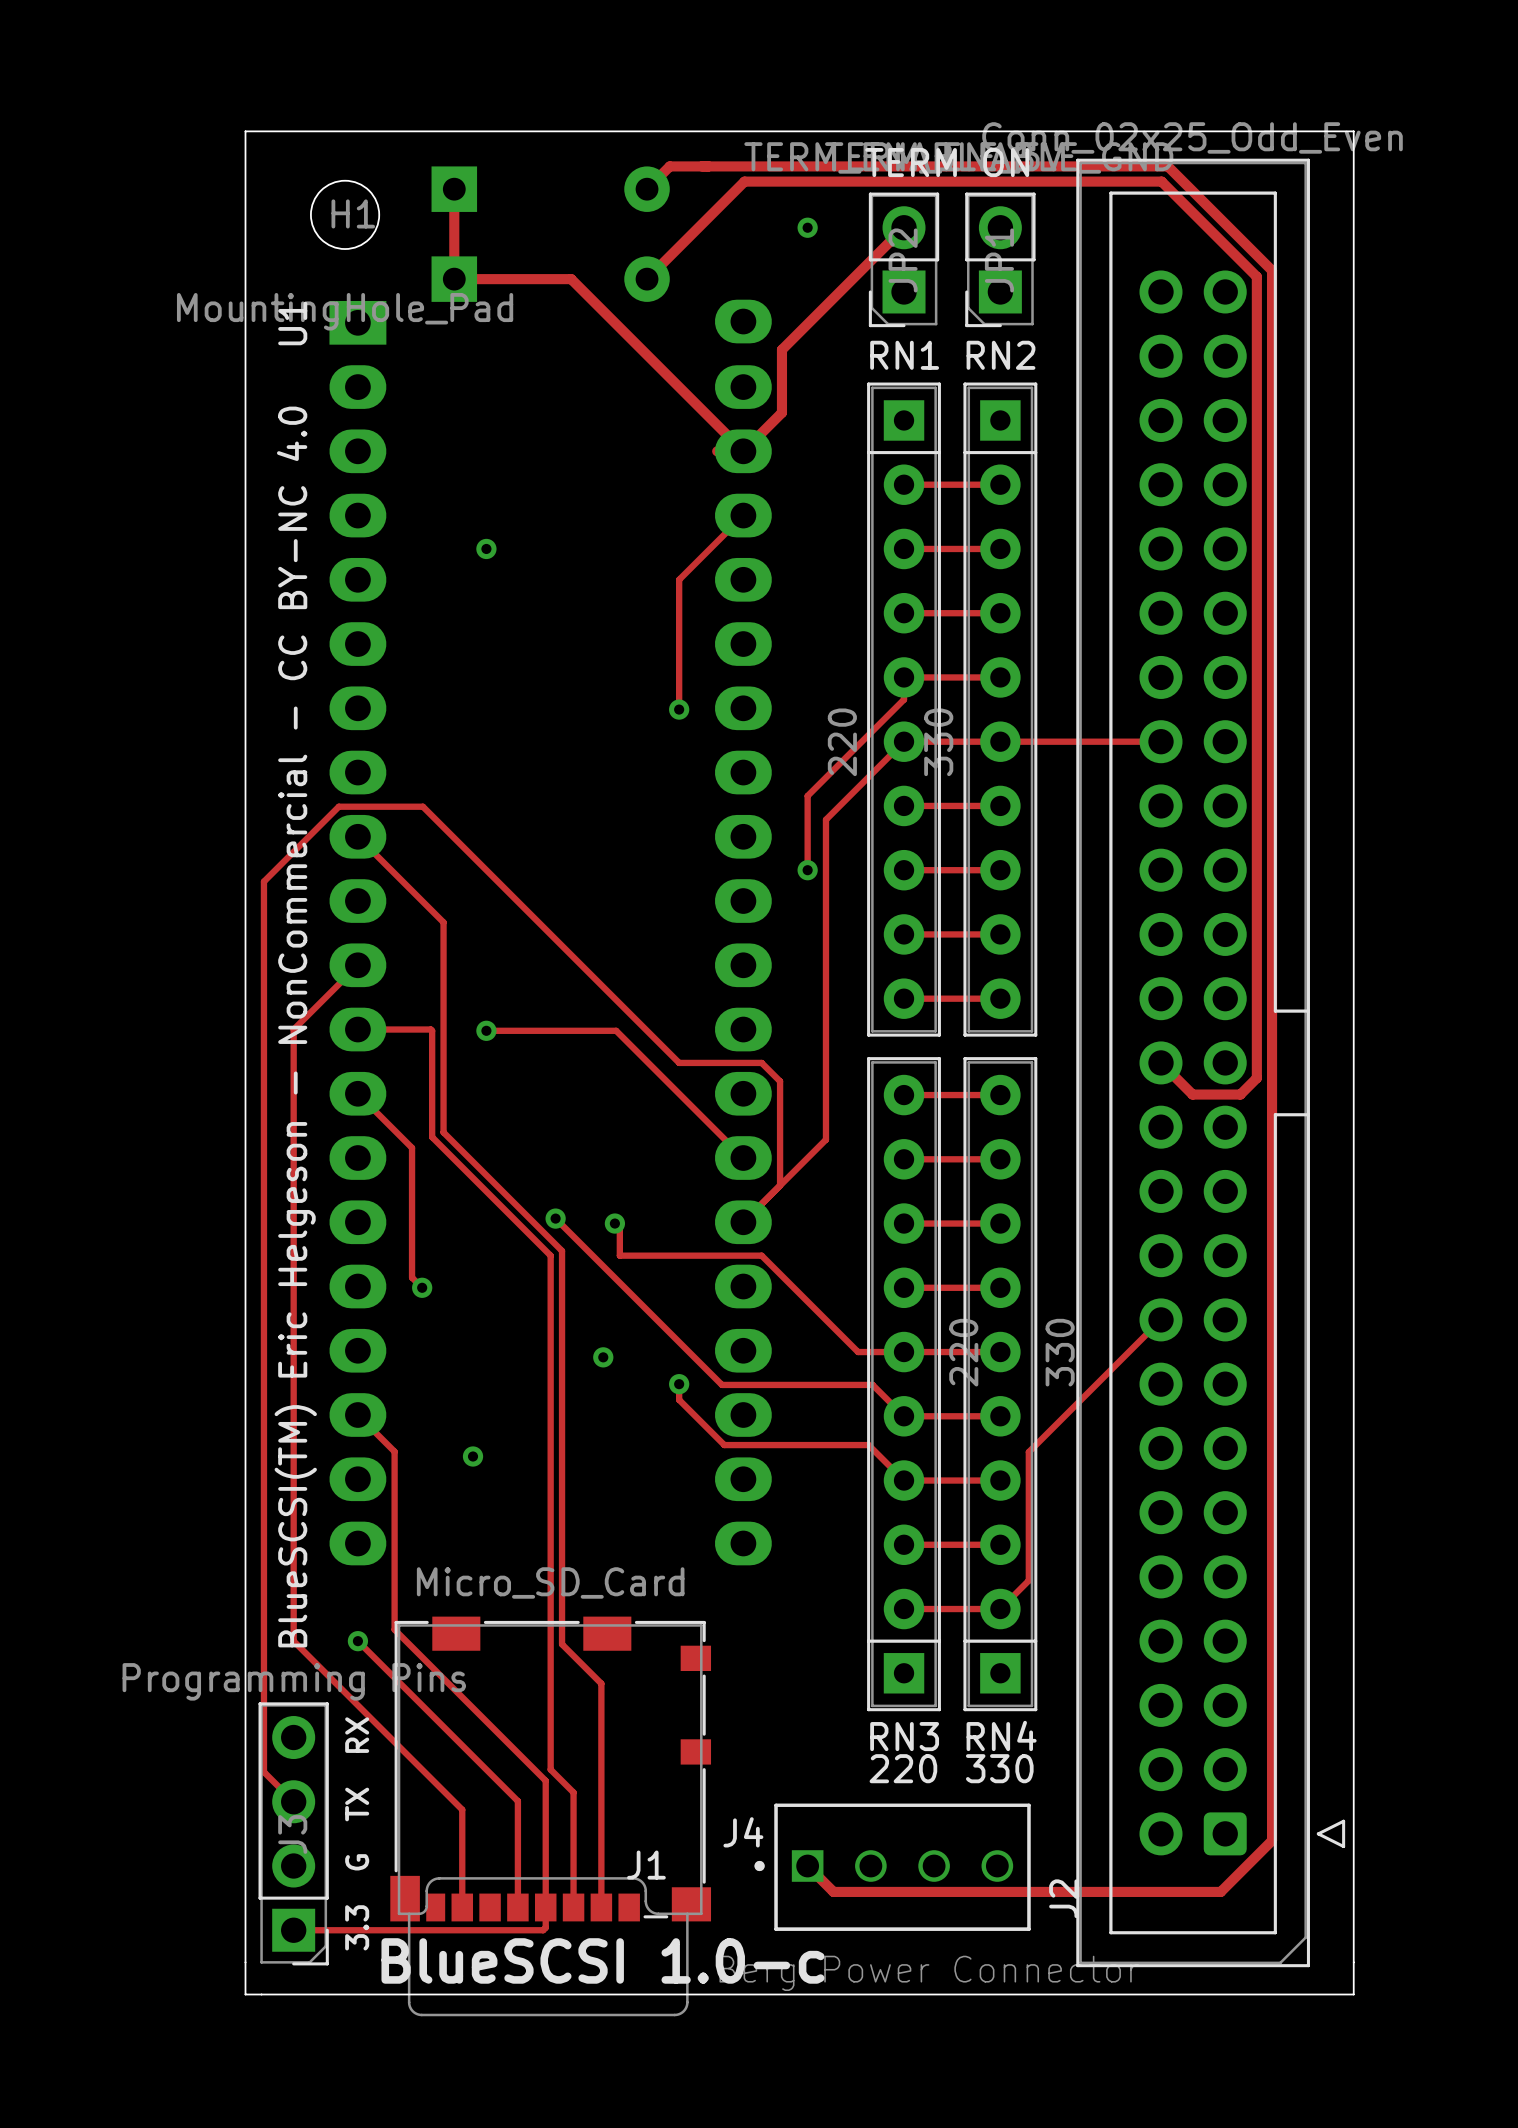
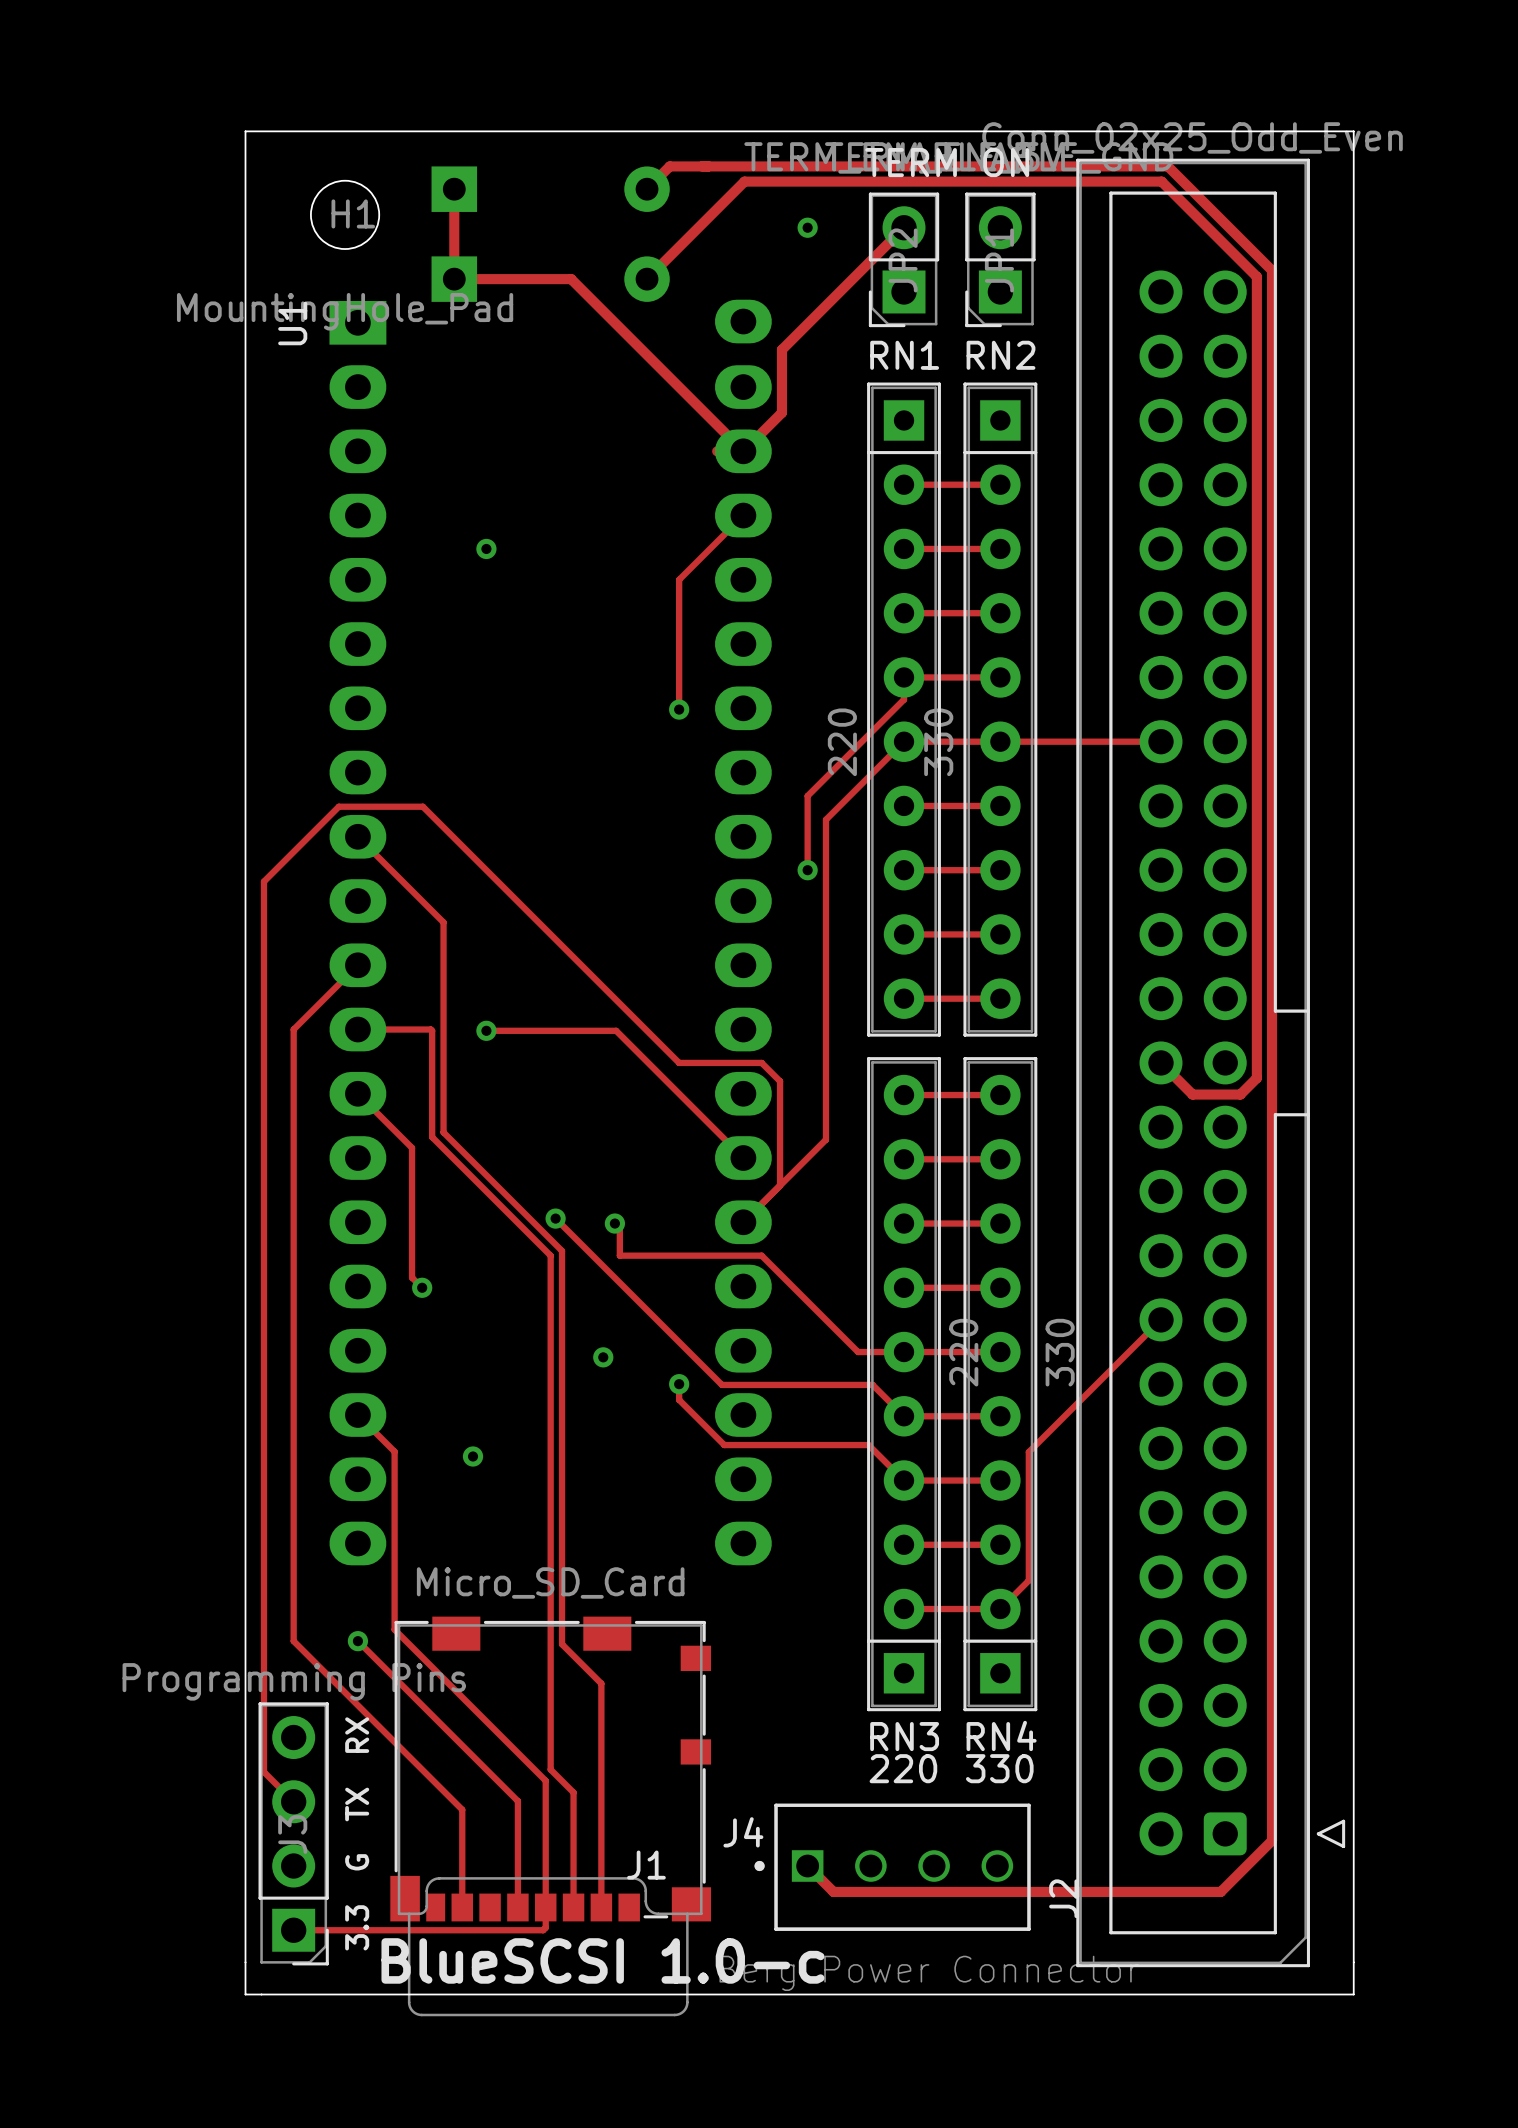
text: BlueSCSI(TM) Eric Helgeson - NonCommercial - CC BY-NC 4.0 (295, 1026) -> none

